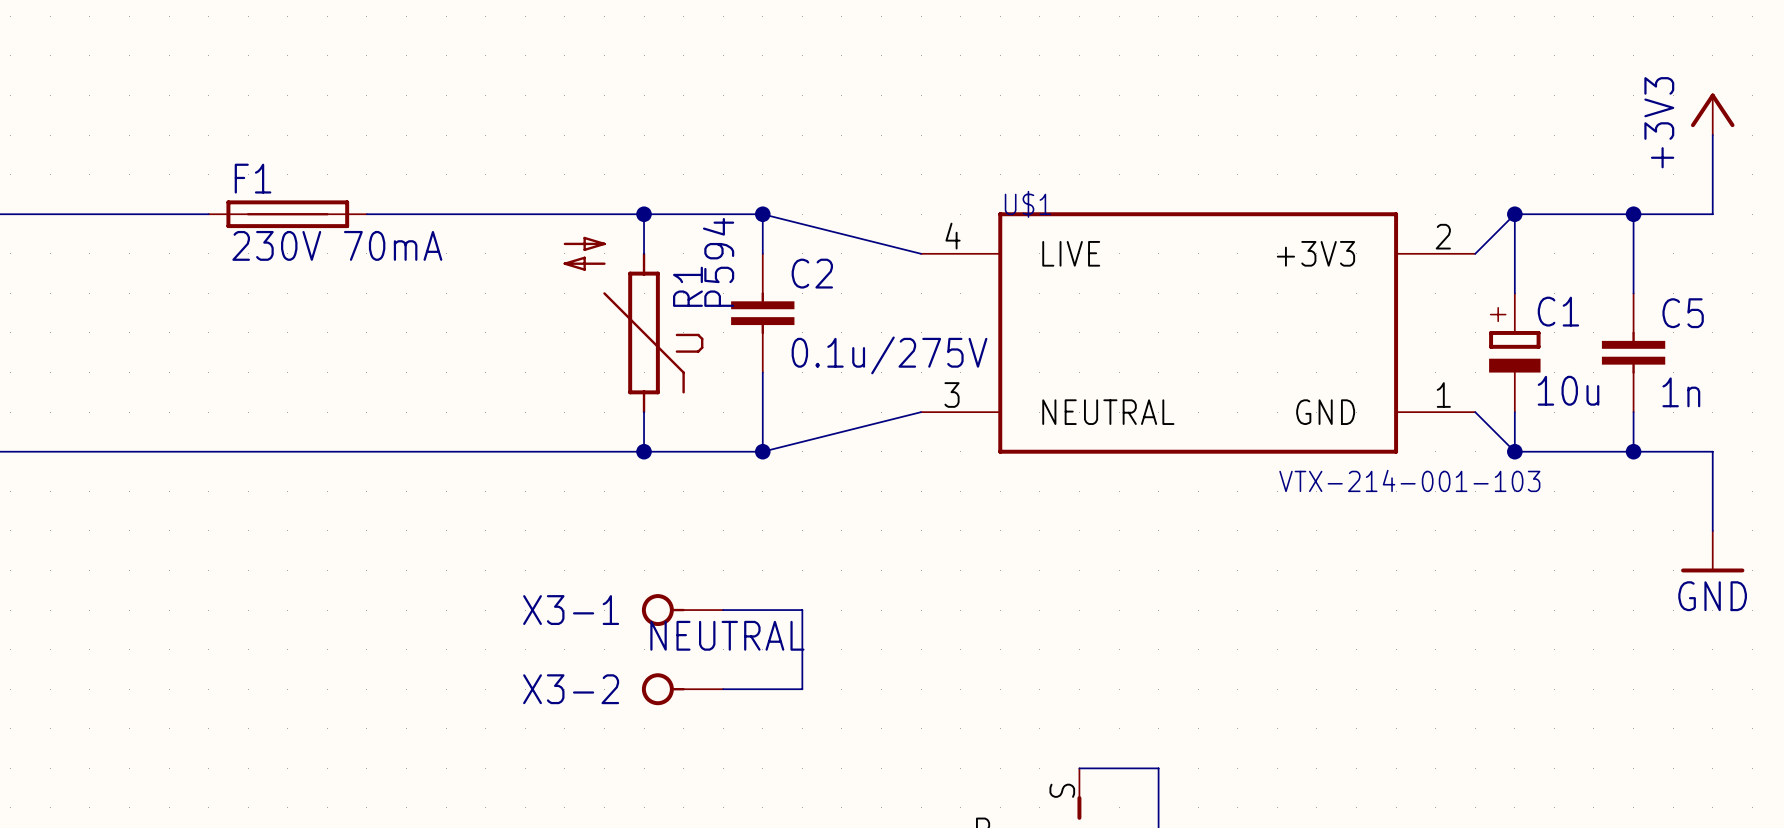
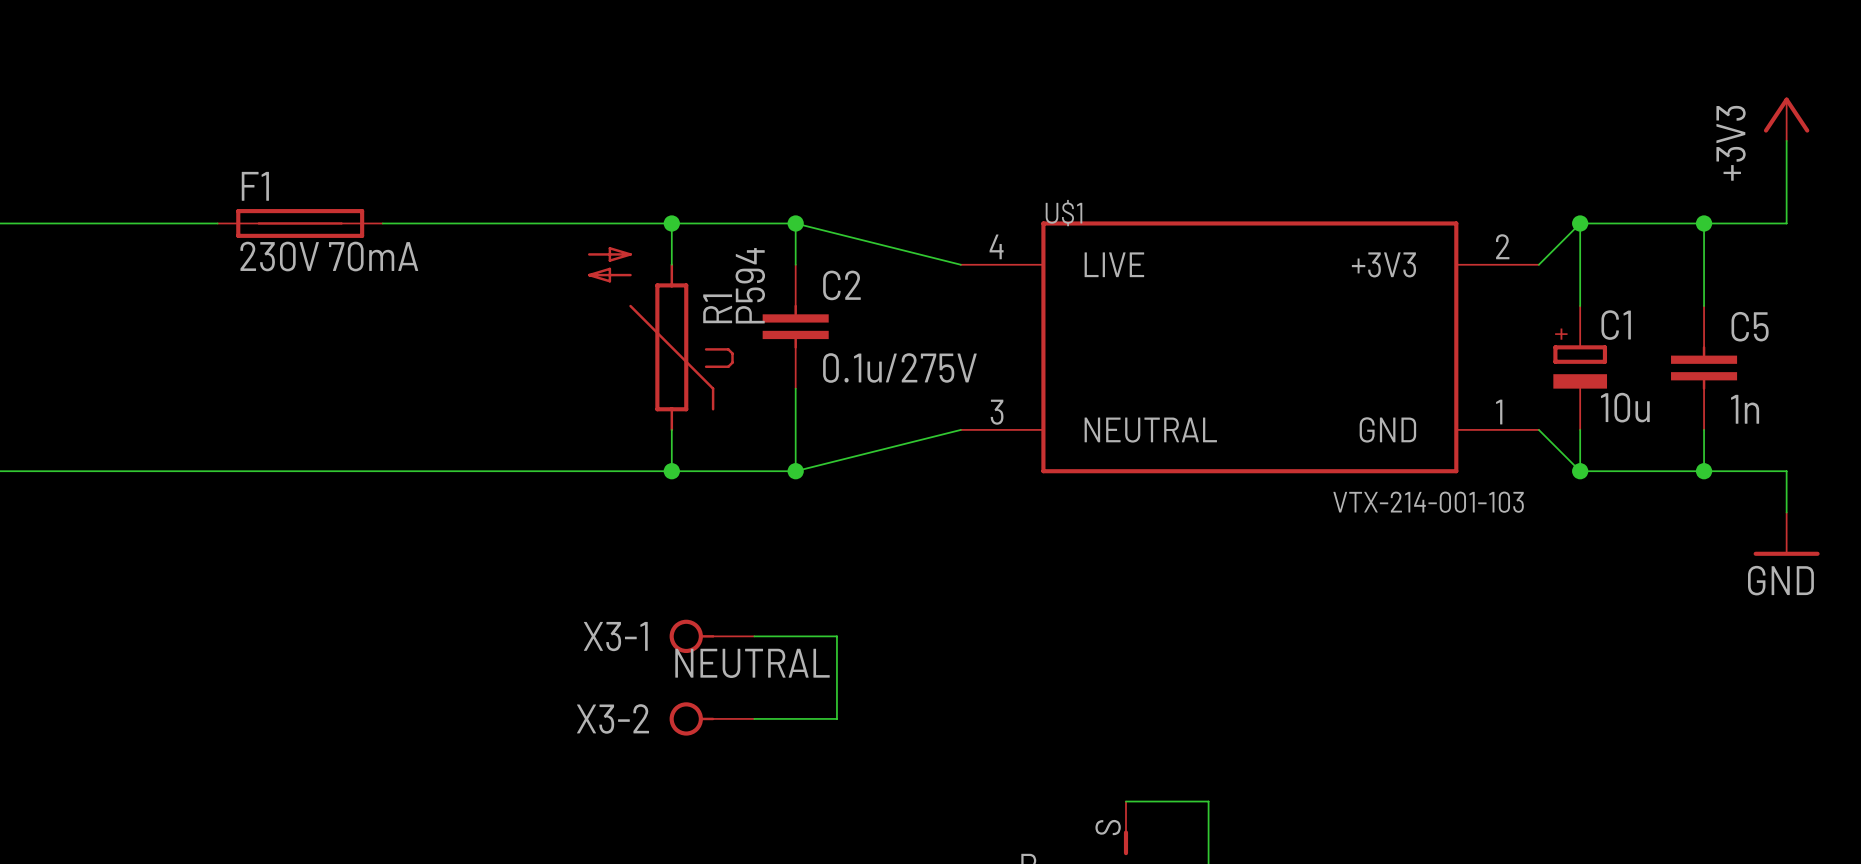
power symbol position: GND (1712, 551) -> GND (1786, 534)

